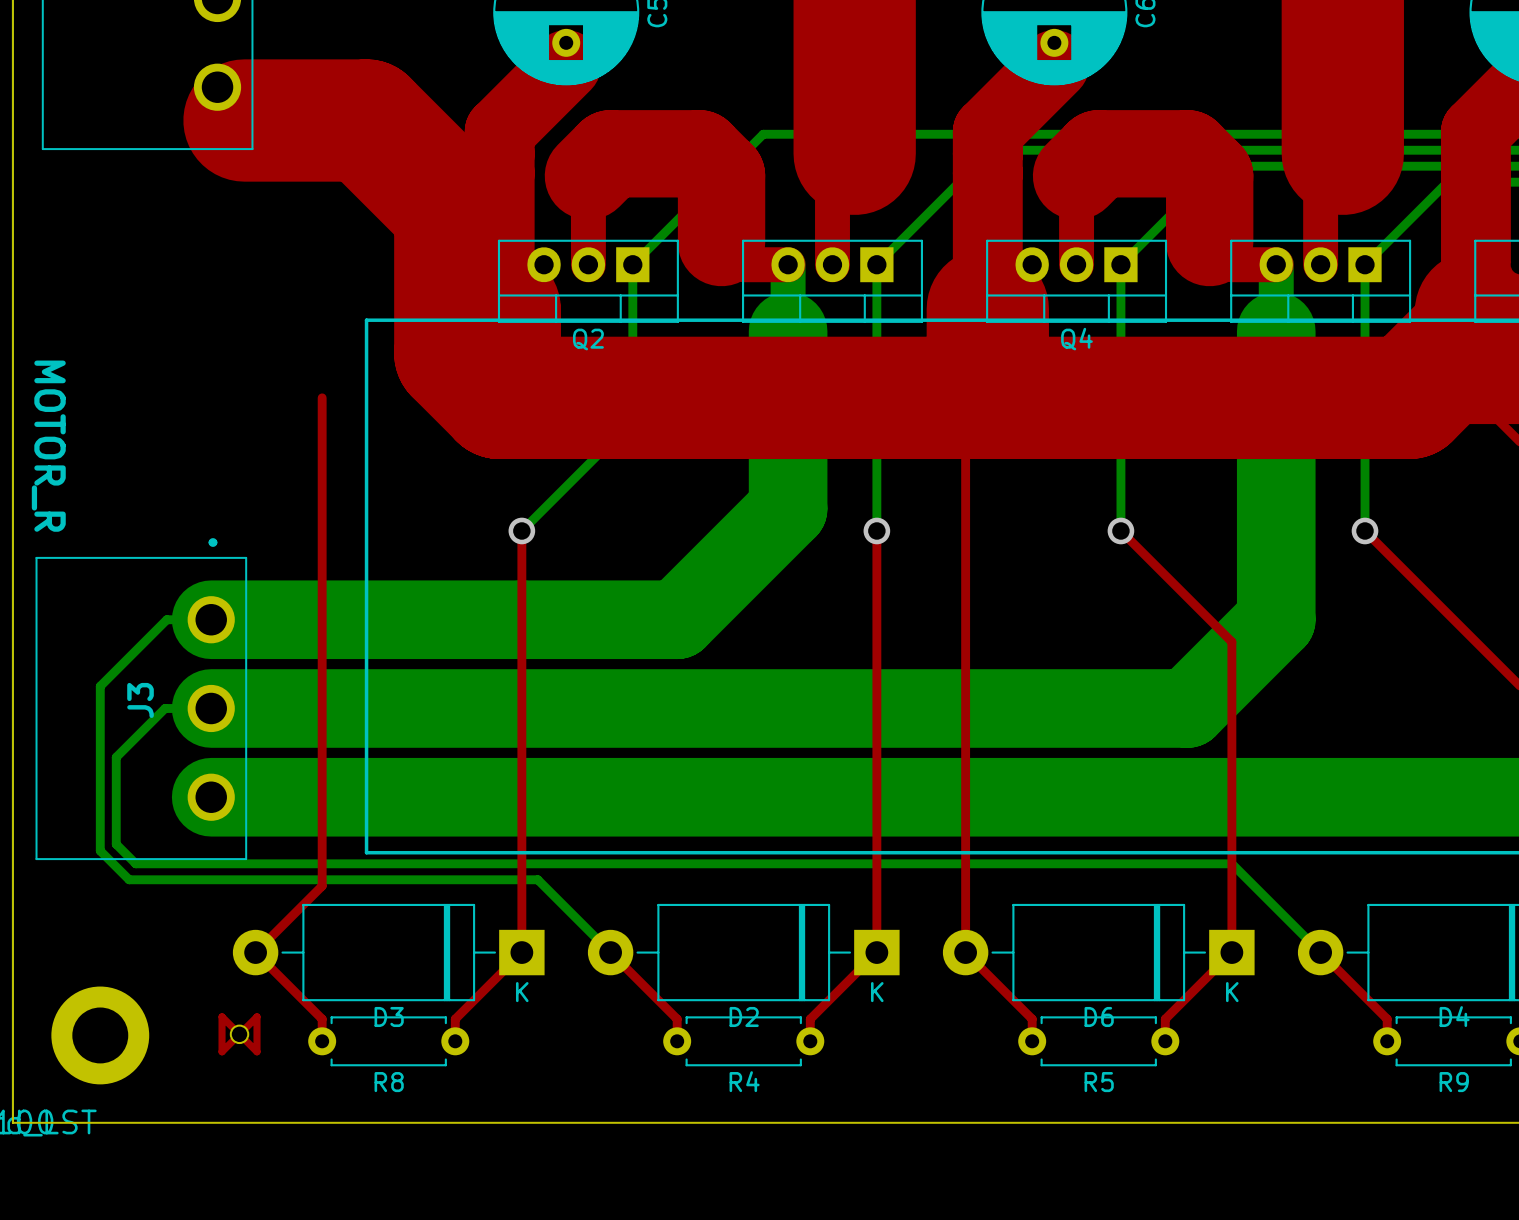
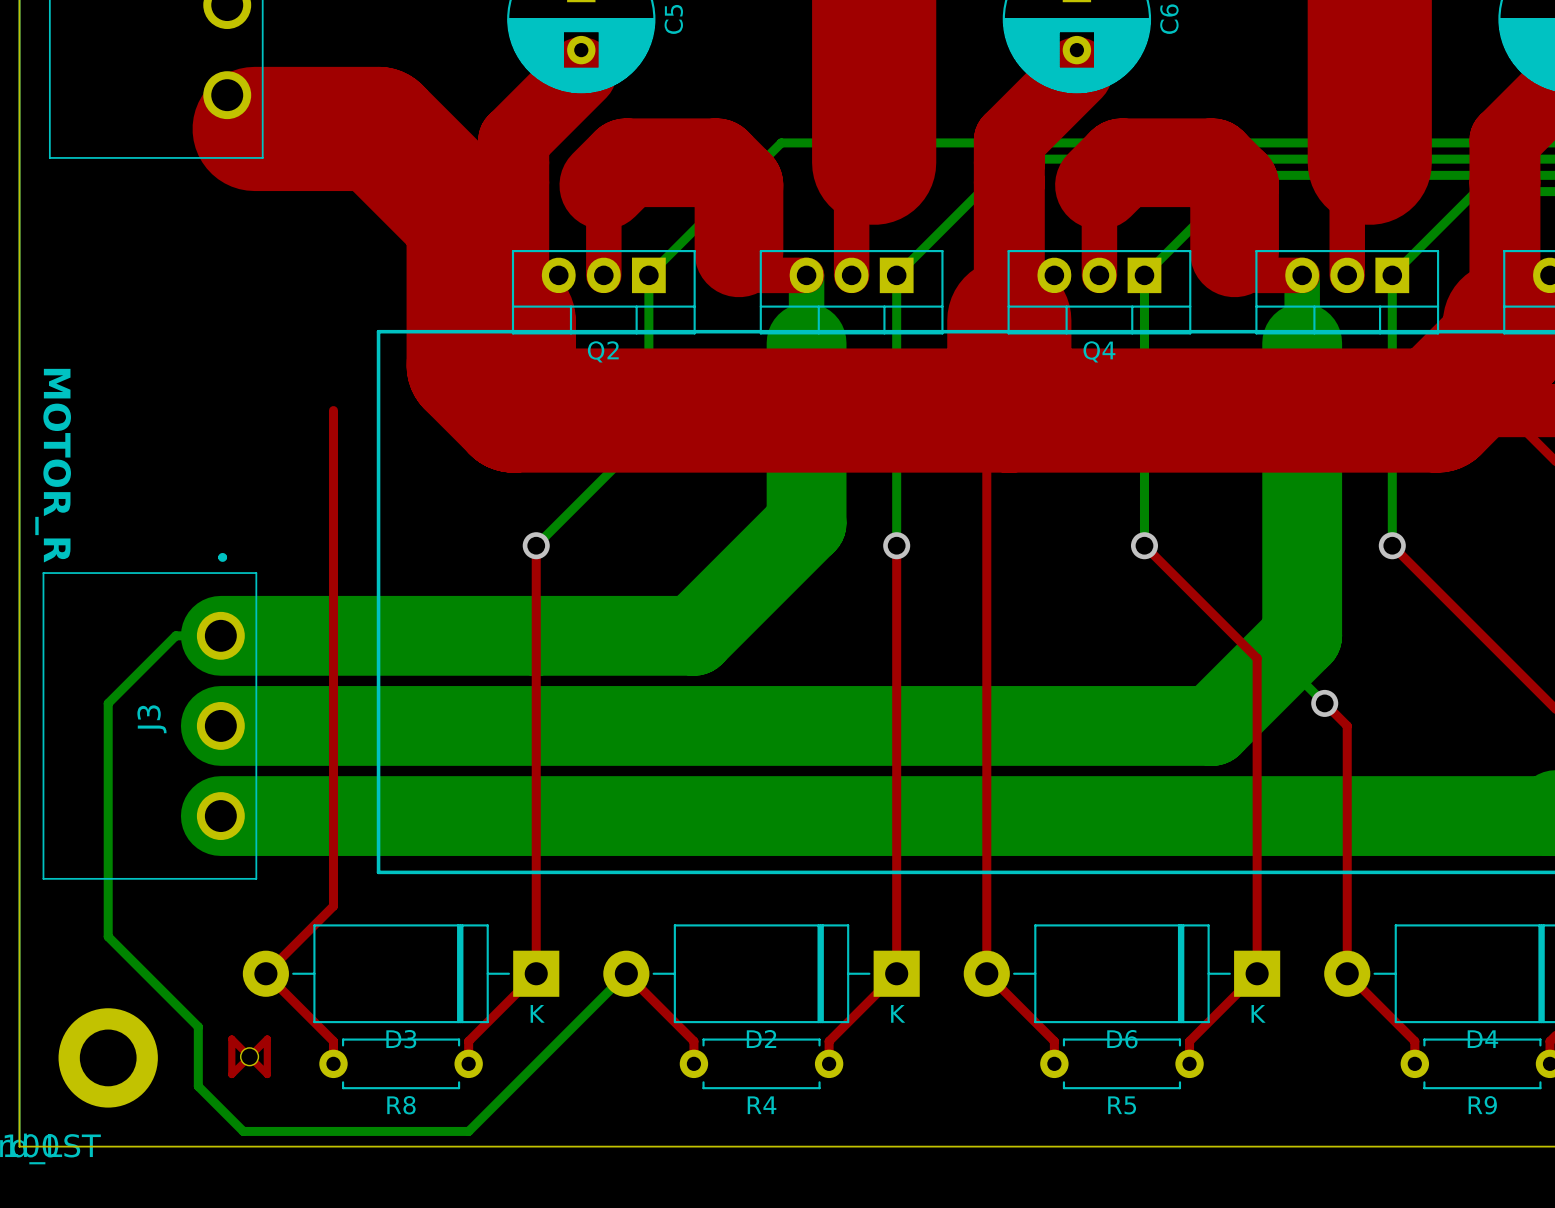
bottom track: none -> (1302, 680) (1324, 703)
top track: none -> (1324, 703) (1347, 725) (1347, 973)
via: none -> (1324, 703)
bottom track: (211, 708) (165, 708) (116, 757) (116, 844) (135, 863) (1231, 863) (1320, 952) -> none
bottom track: (100, 850) (129, 879) (537, 879) (610, 952) -> (108, 870) (108, 936) (198, 1026) (198, 1086) (243, 1131) (468, 1131) (626, 973)

